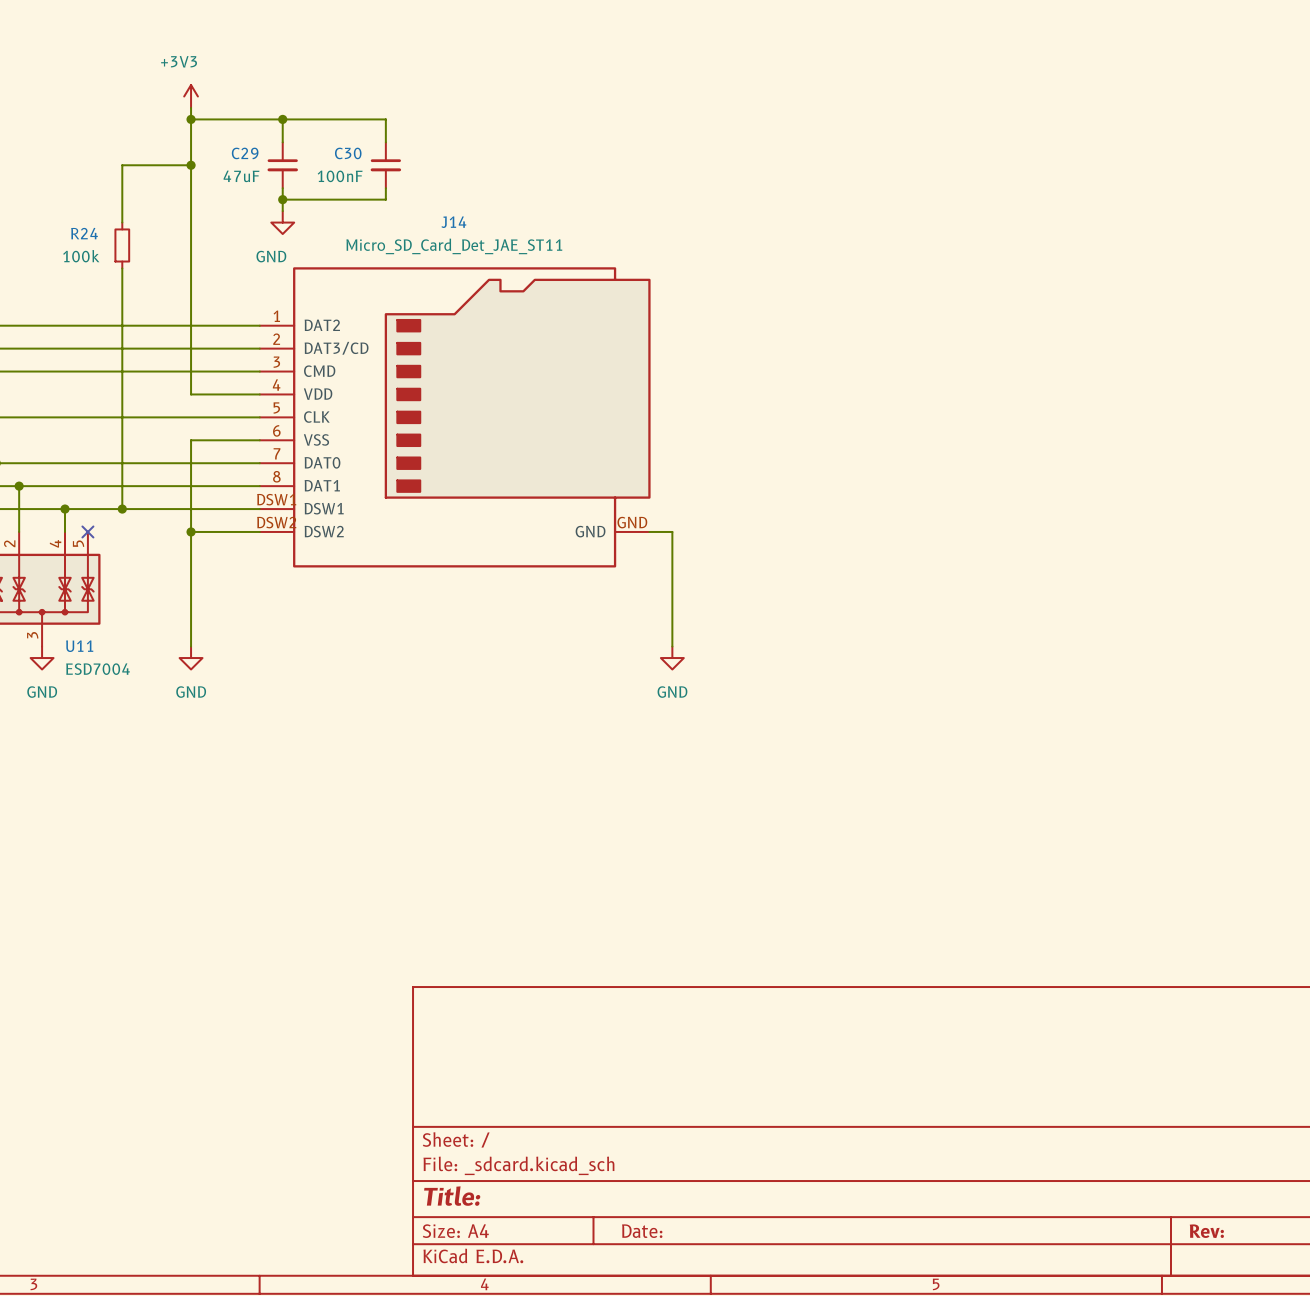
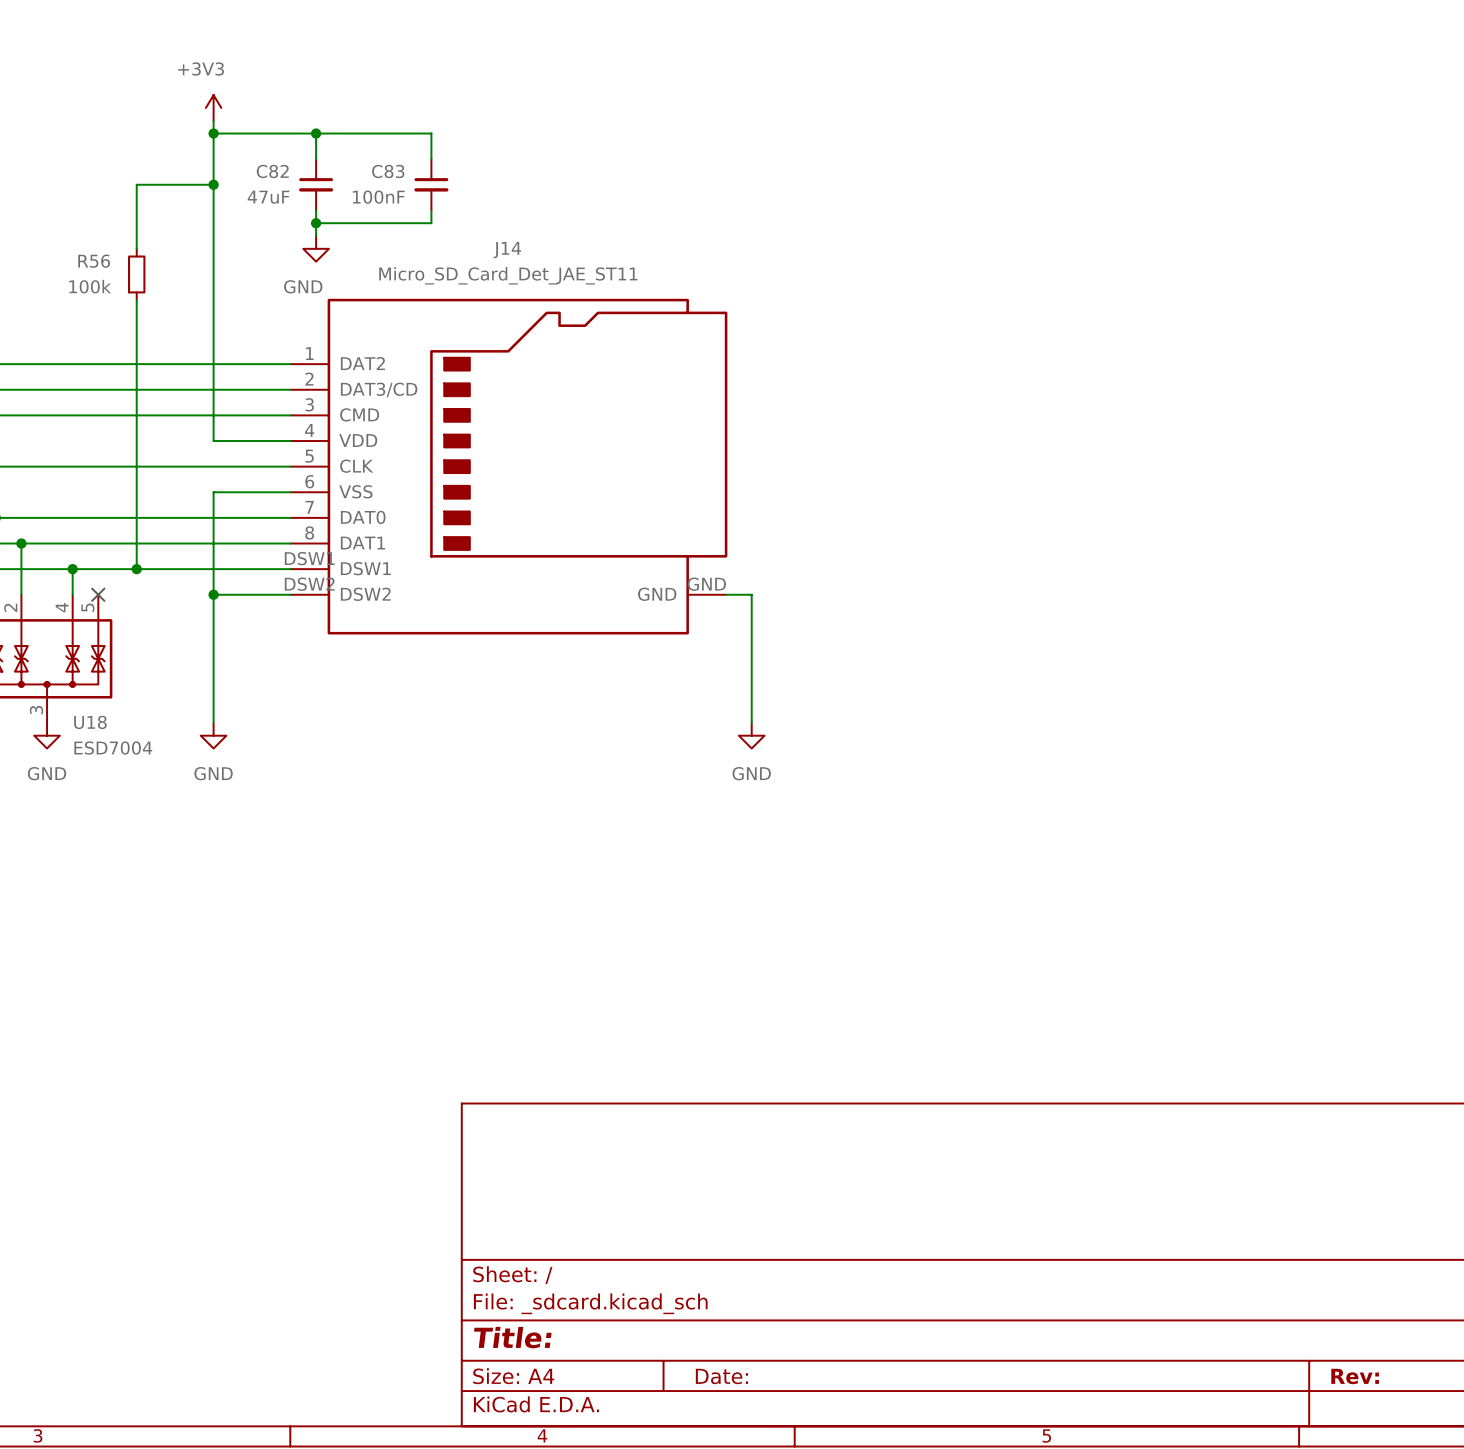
C29 name: C29 (245, 153) -> C82 (272, 171)
C30 name: C30 (348, 153) -> C83 (388, 171)
R24 name: R24 (84, 233) -> R56 (94, 261)
U11 name: U11 (79, 646) -> U18 (90, 722)

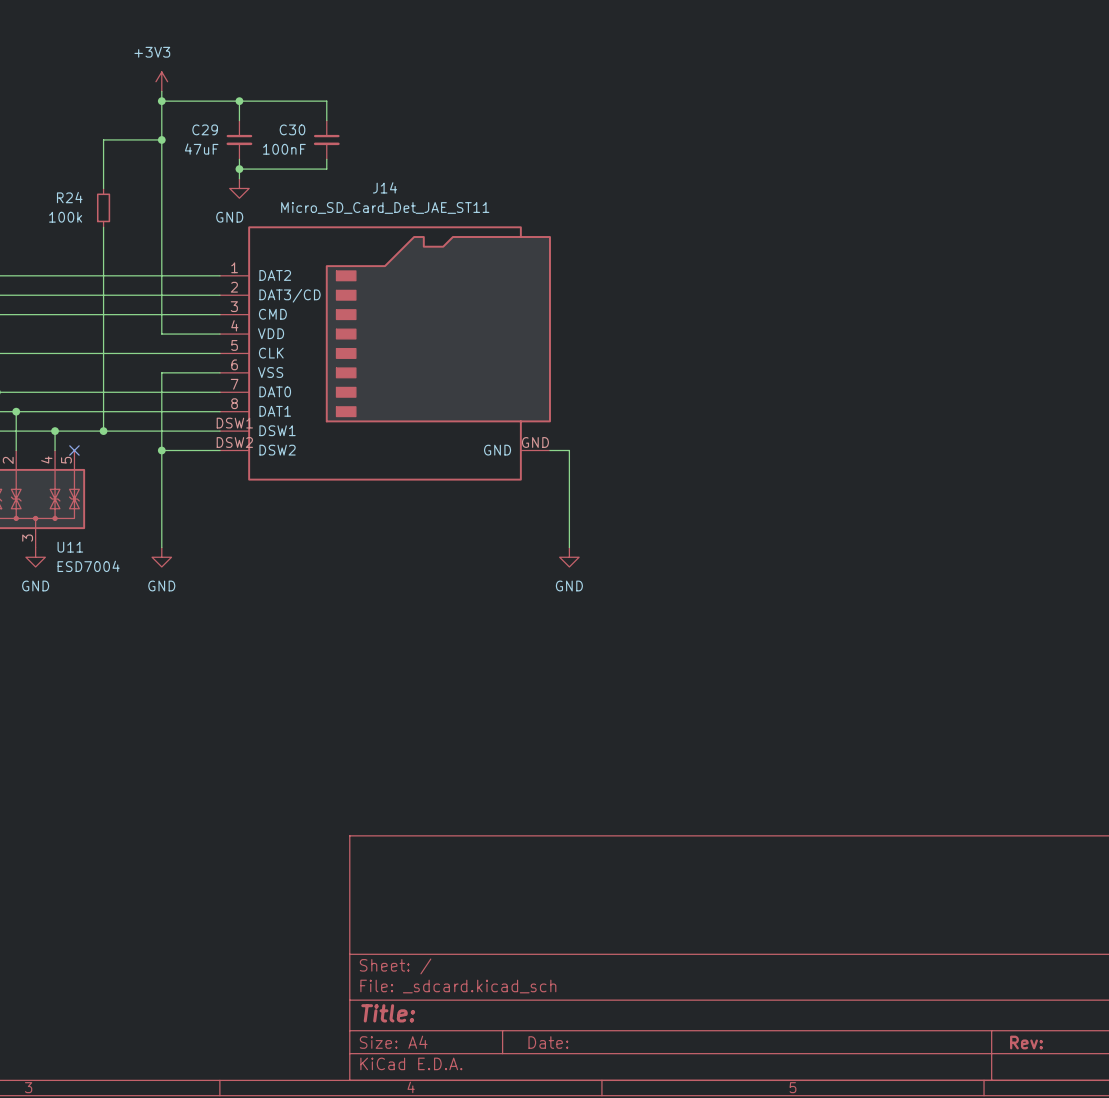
C82 name: C82 (272, 171) -> C29 (205, 129)
C83 name: C83 (388, 171) -> C30 (292, 129)
R56 name: R56 (94, 261) -> R24 (69, 197)
U18 name: U18 (90, 722) -> U11 (70, 547)

